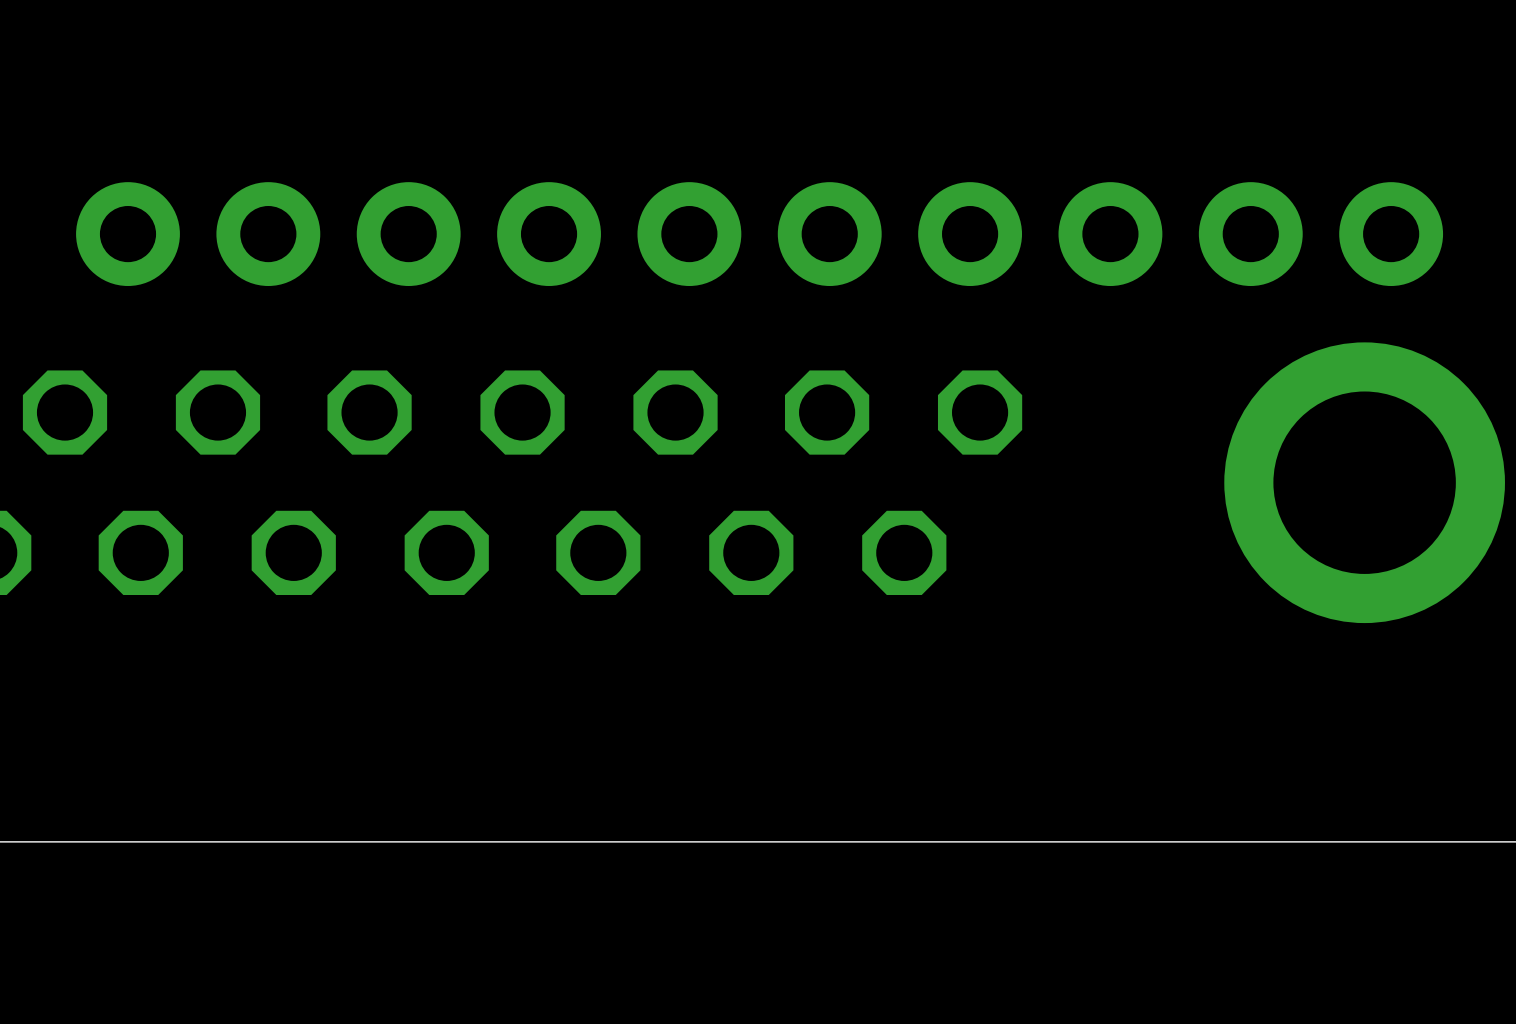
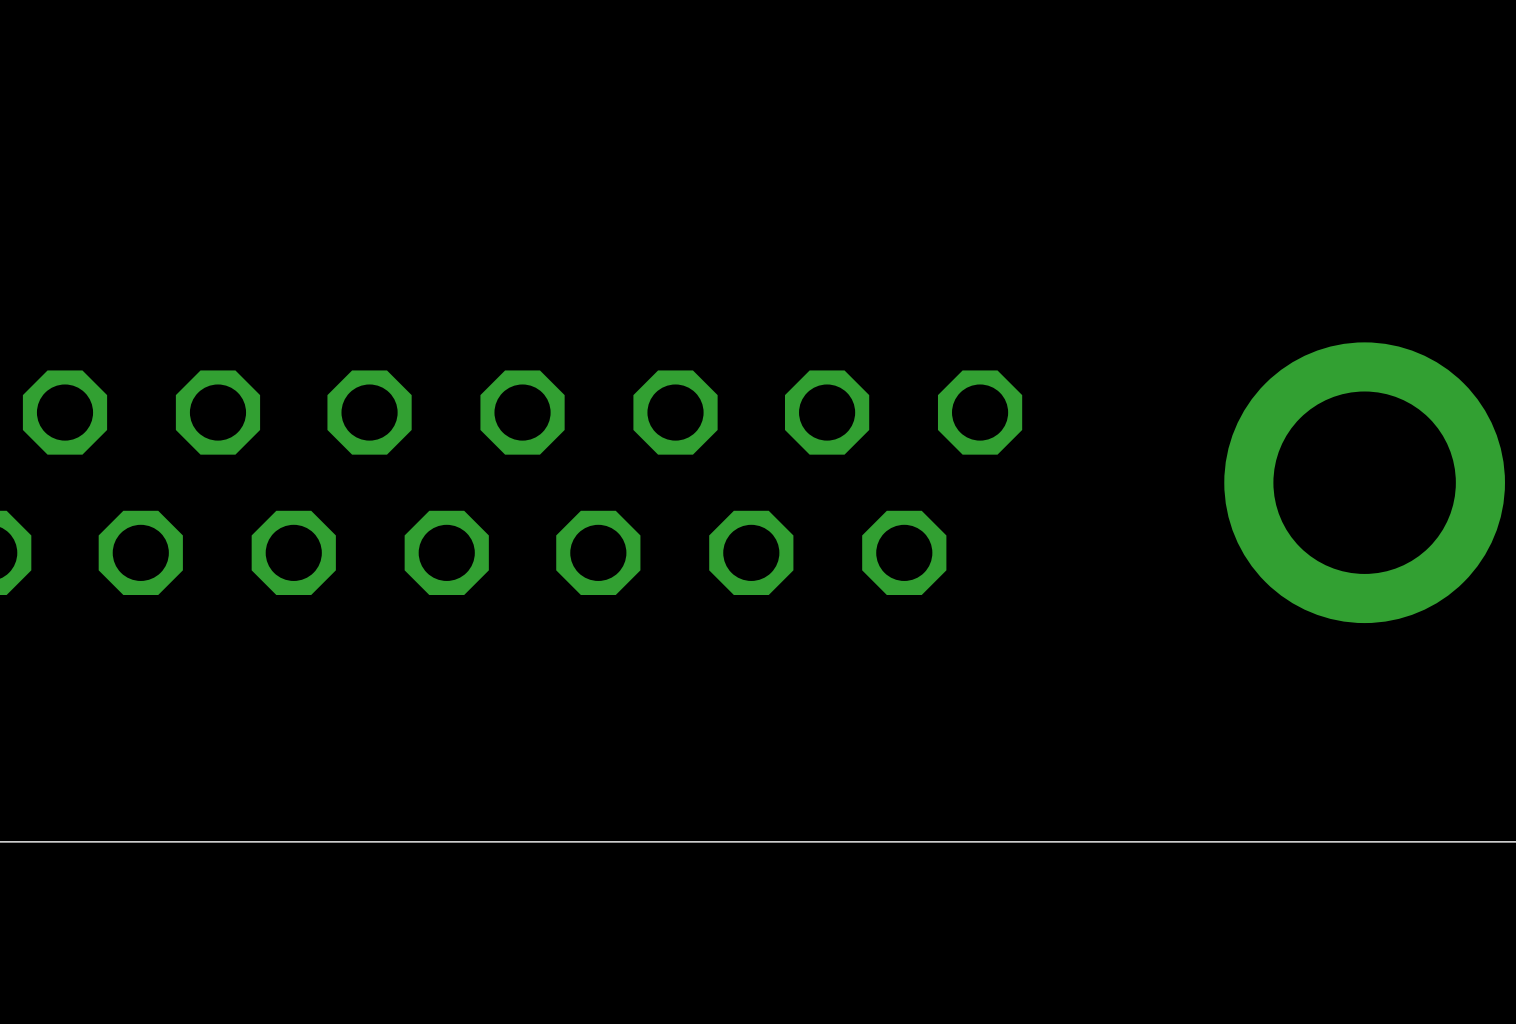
part: (759, 234) -> none

